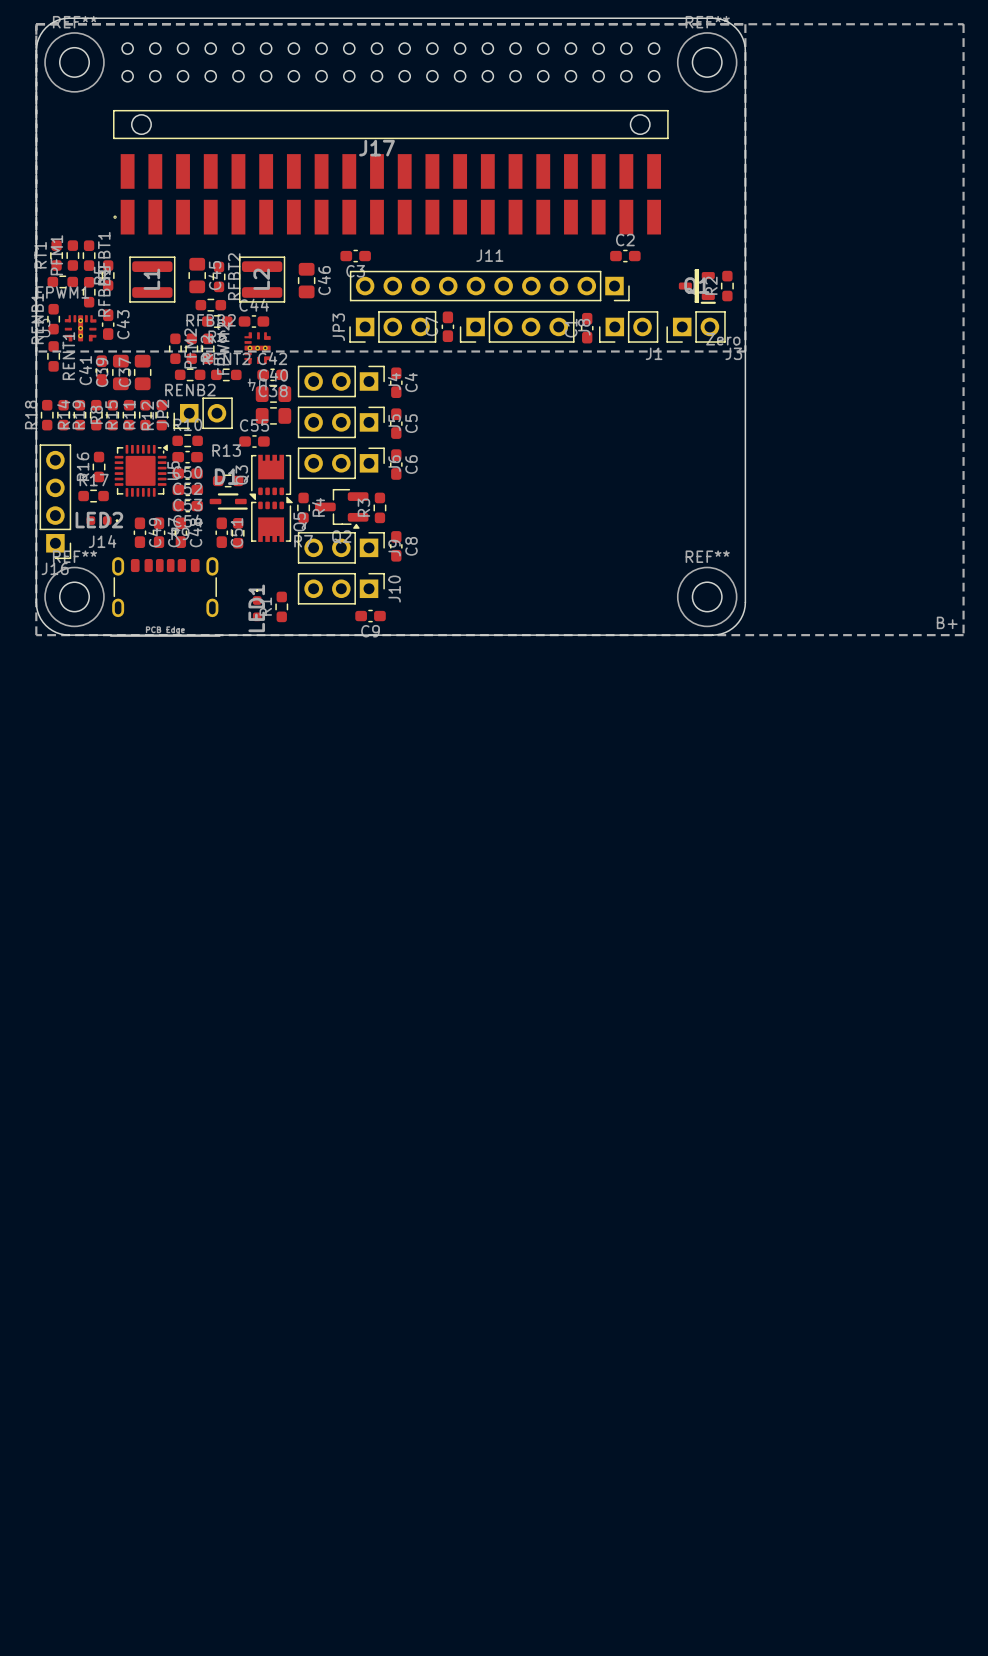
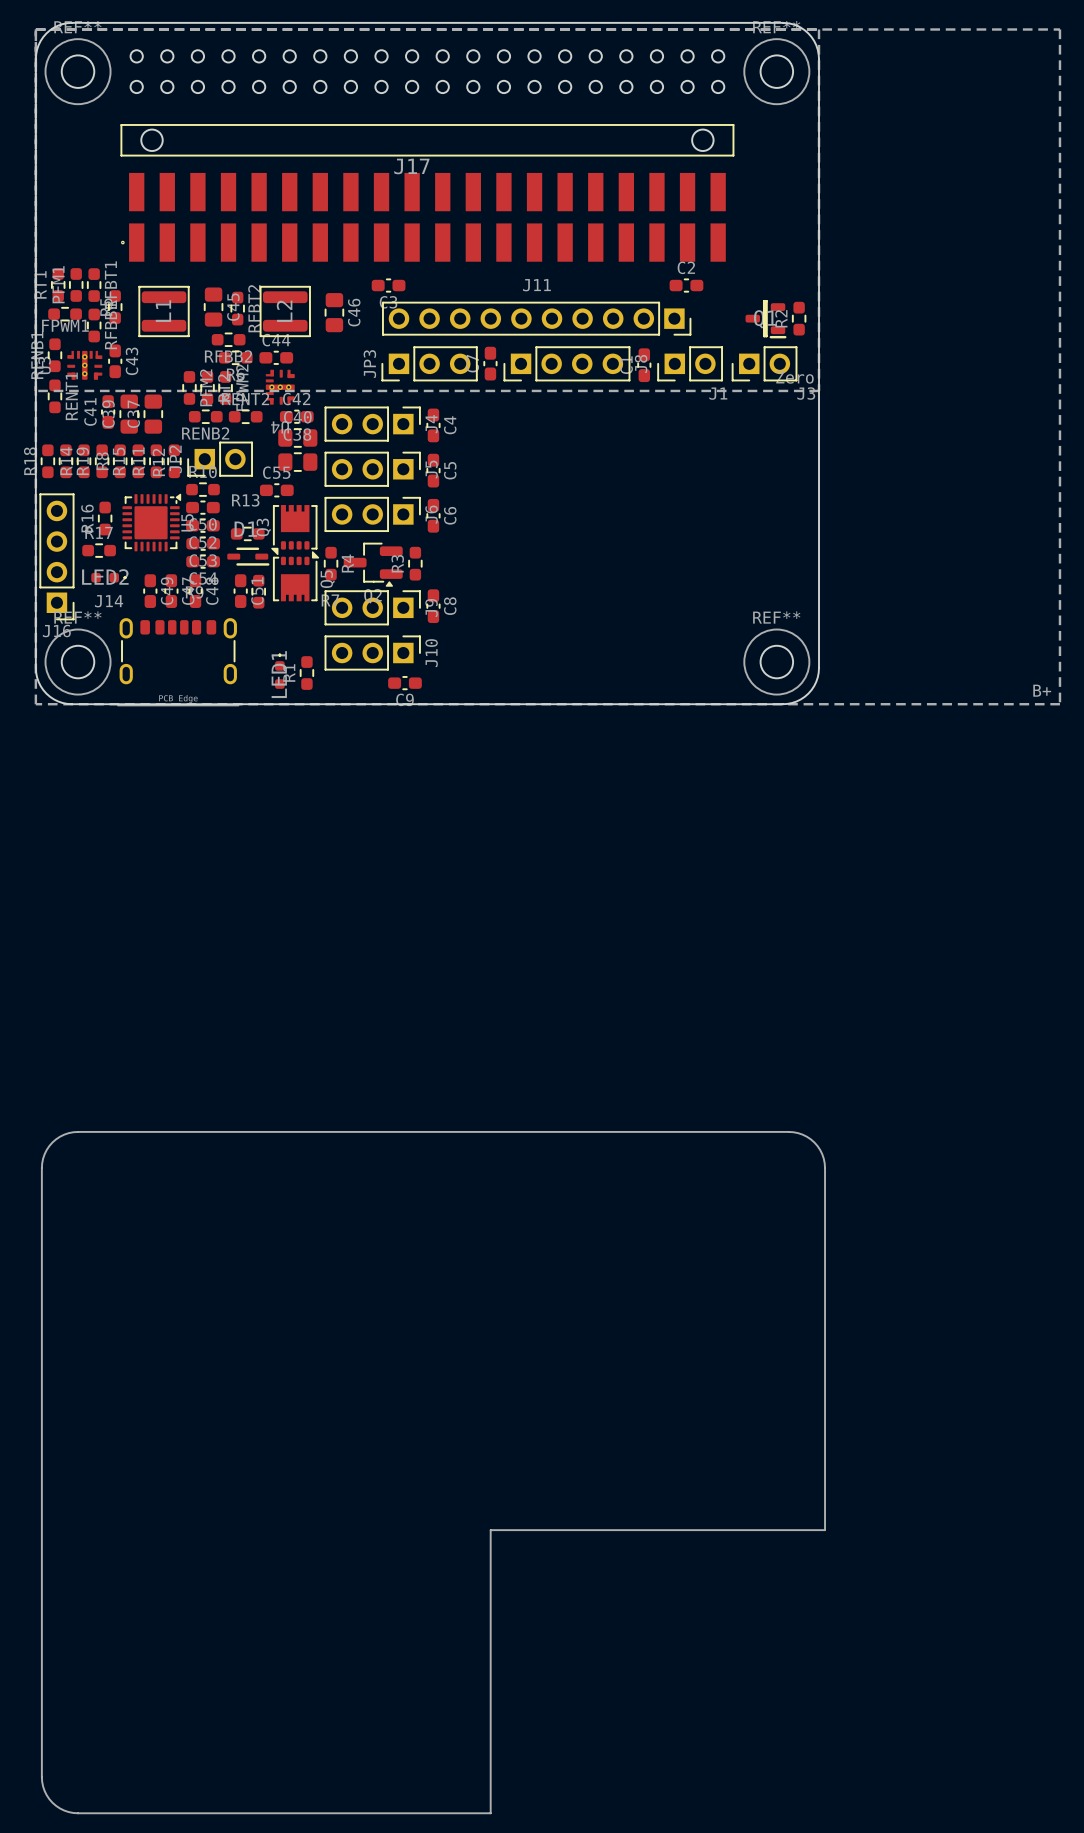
line: none -> (78, 1131) (788, 1131) (806, 1136) (820, 1150) (825, 1168) (825, 1530) (490, 1530) (490, 1813) (78, 1813) (59, 1808) (46, 1795) (41, 1777) (41, 1168) (44, 1154) (52, 1142) (64, 1134) (78, 1131)

